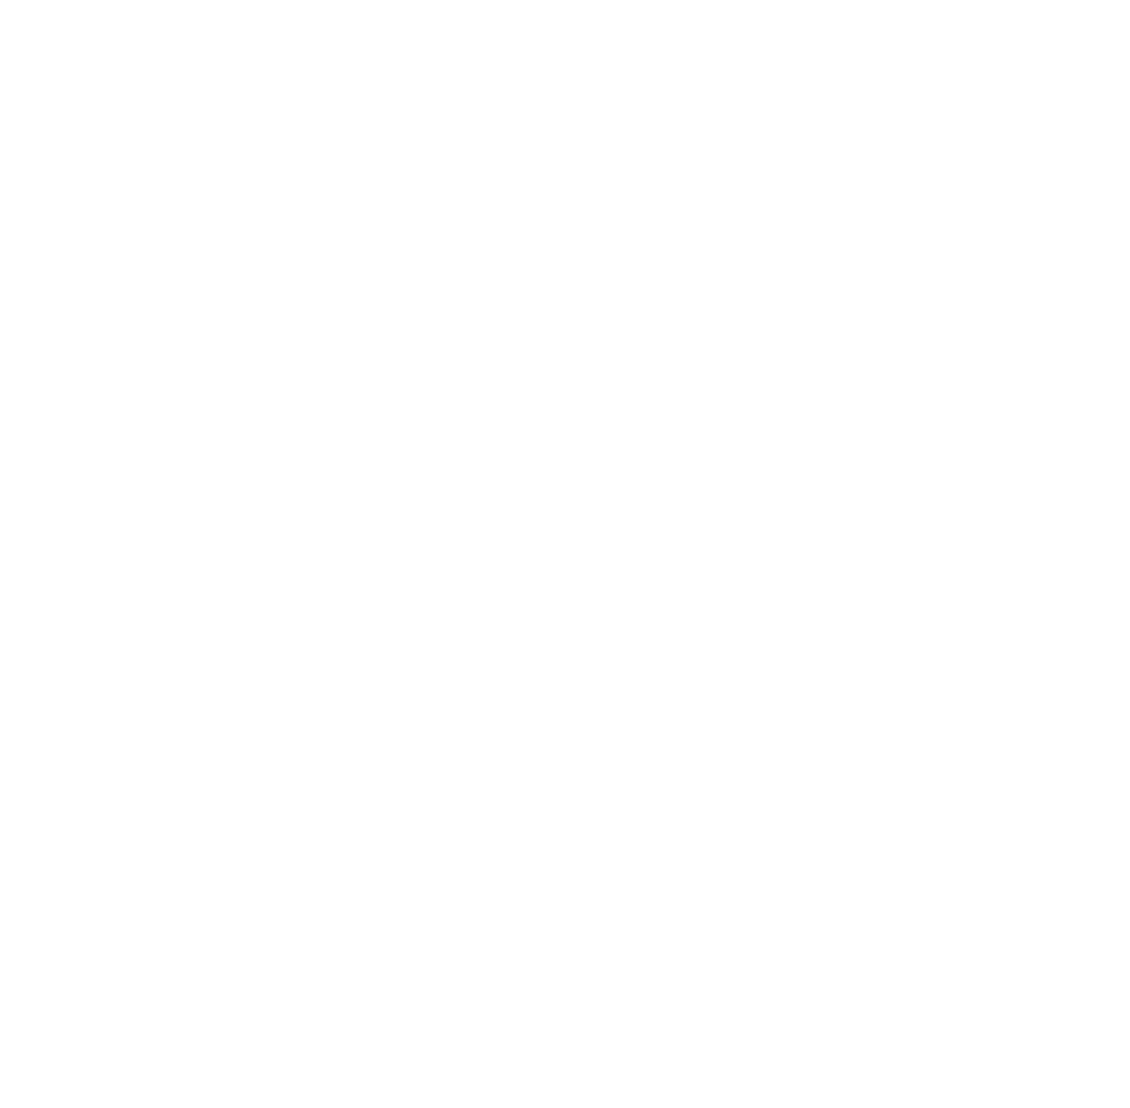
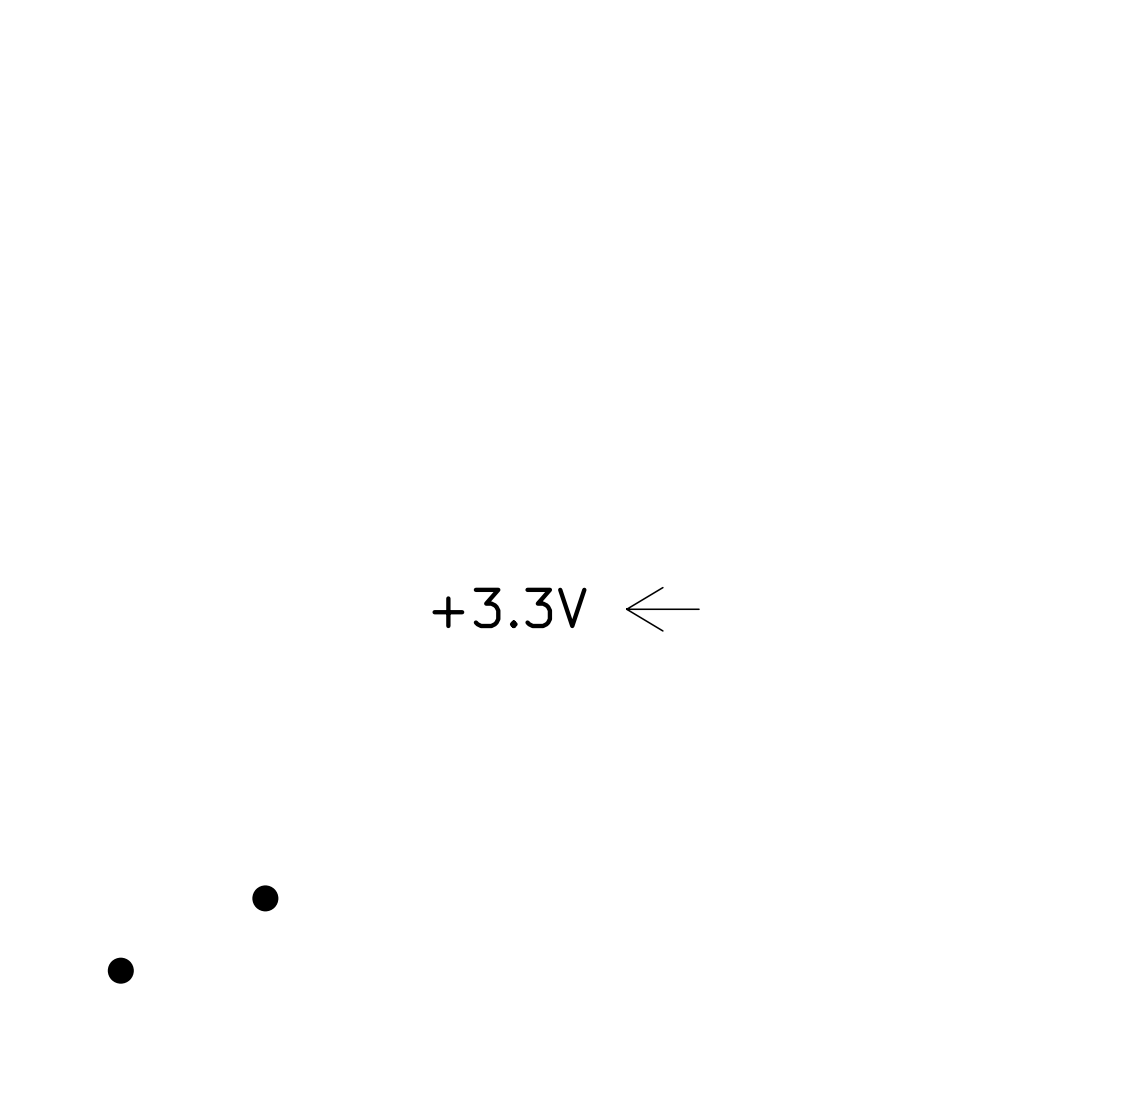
power symbol: none -> +3.3V (662, 609)
junction: none -> (265, 898)
junction: none -> (120, 970)

